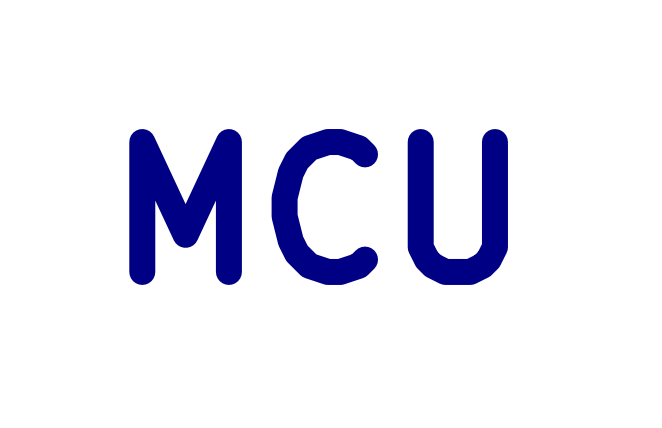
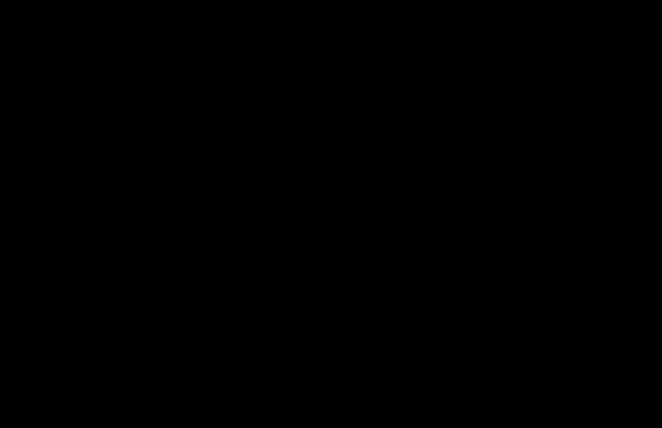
text: MCU (318, 206) -> none

